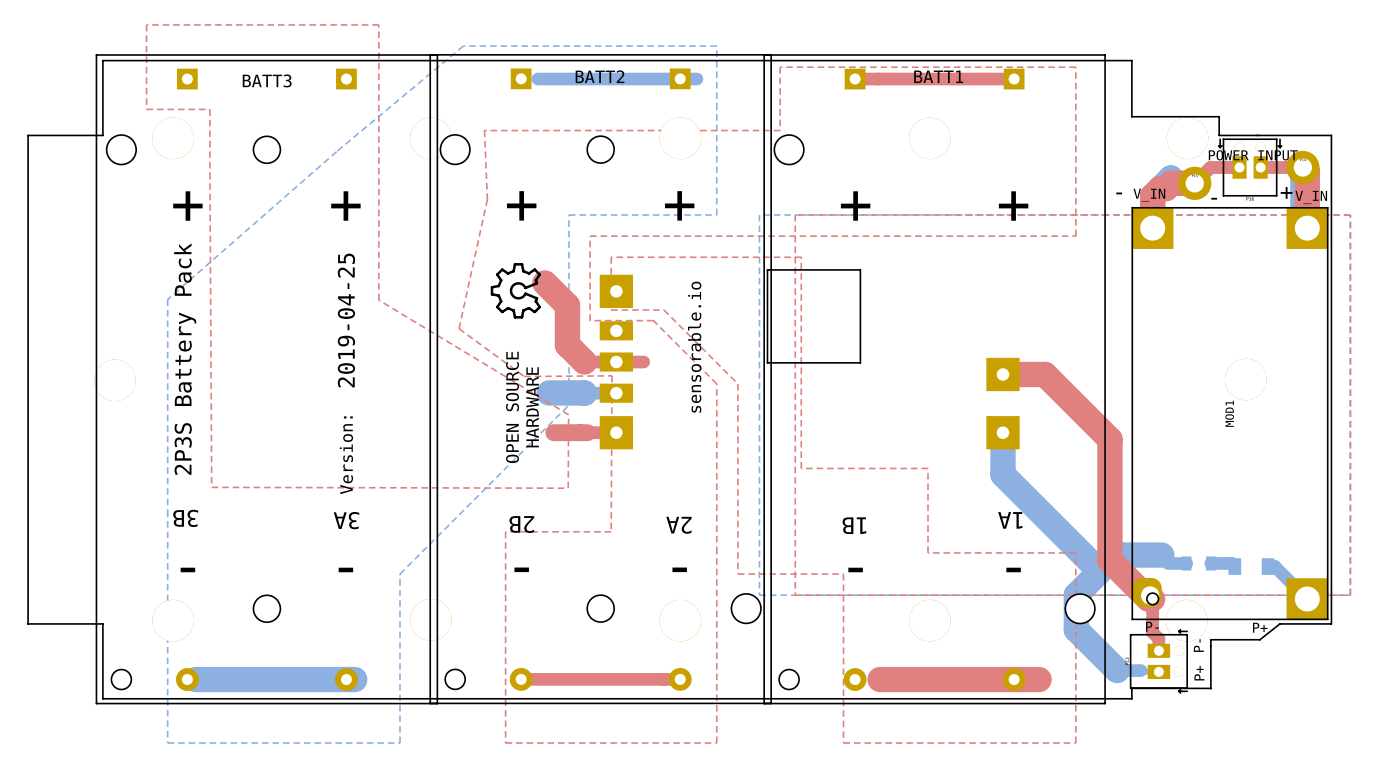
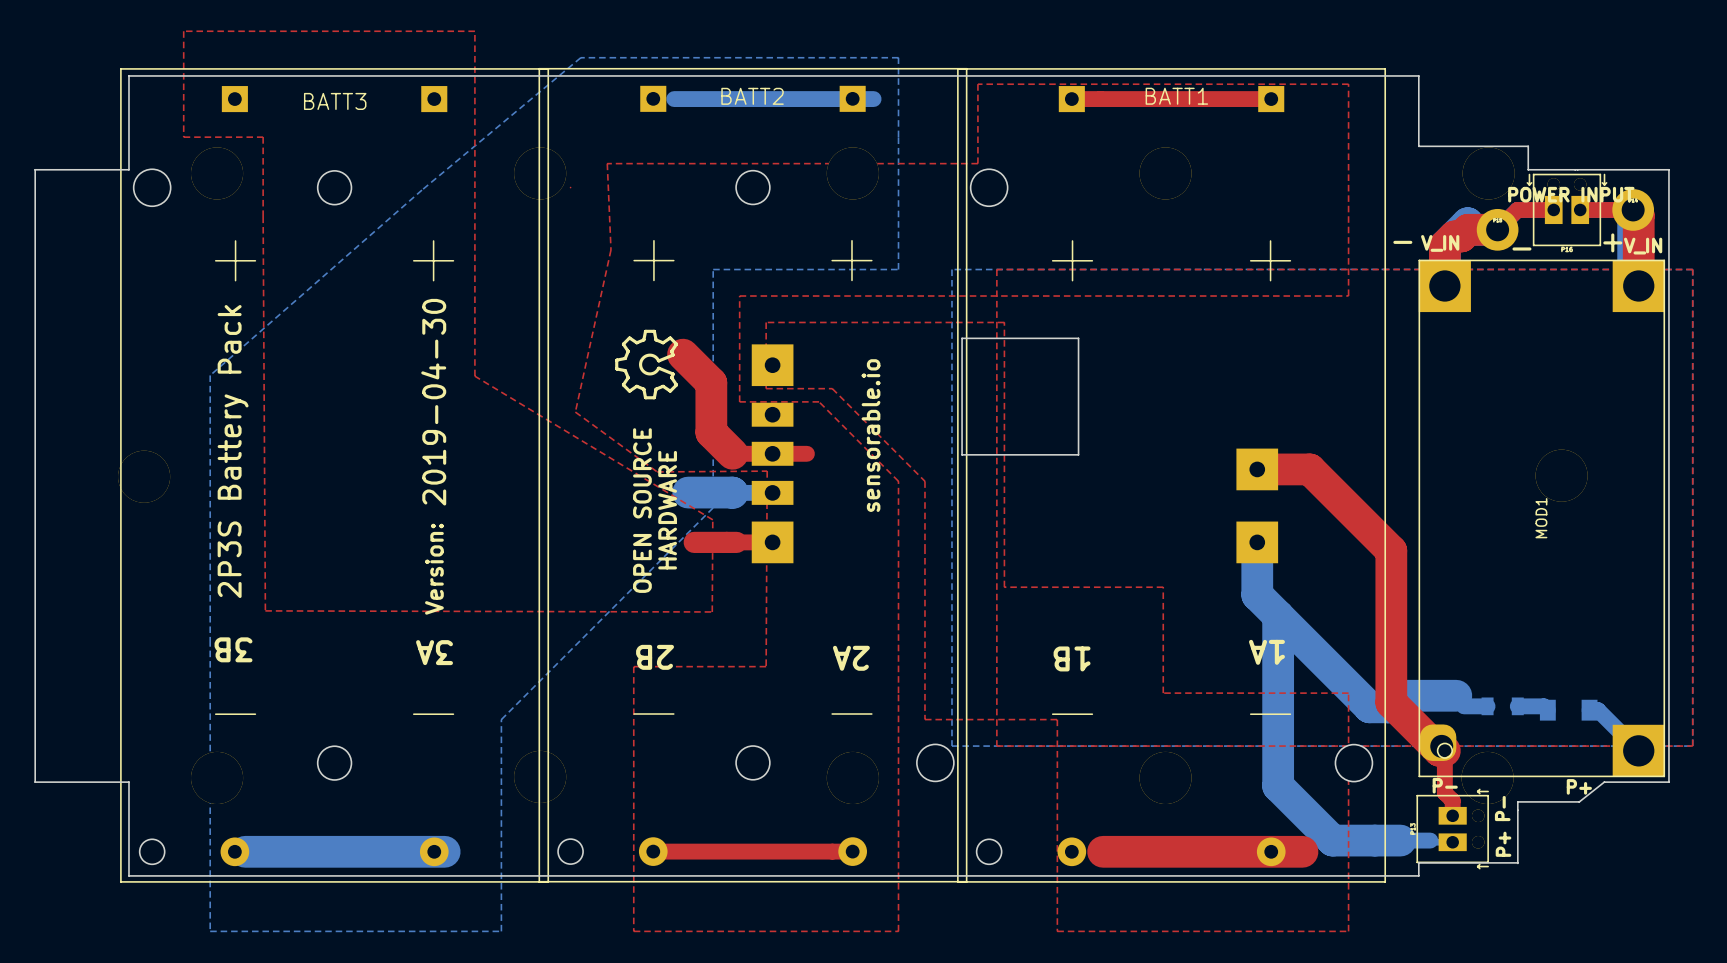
BATT2 footprint: [429, 54, 772, 705] -> [538, 67, 968, 883]
text: 2019-04-25 (346, 320) -> 2019-04-30 (433, 402)
bottom track: (1107, 564) (1076, 594) (1076, 629) (1117, 670) -> (1278, 615) (1278, 786) (1332, 840) (1400, 840)

